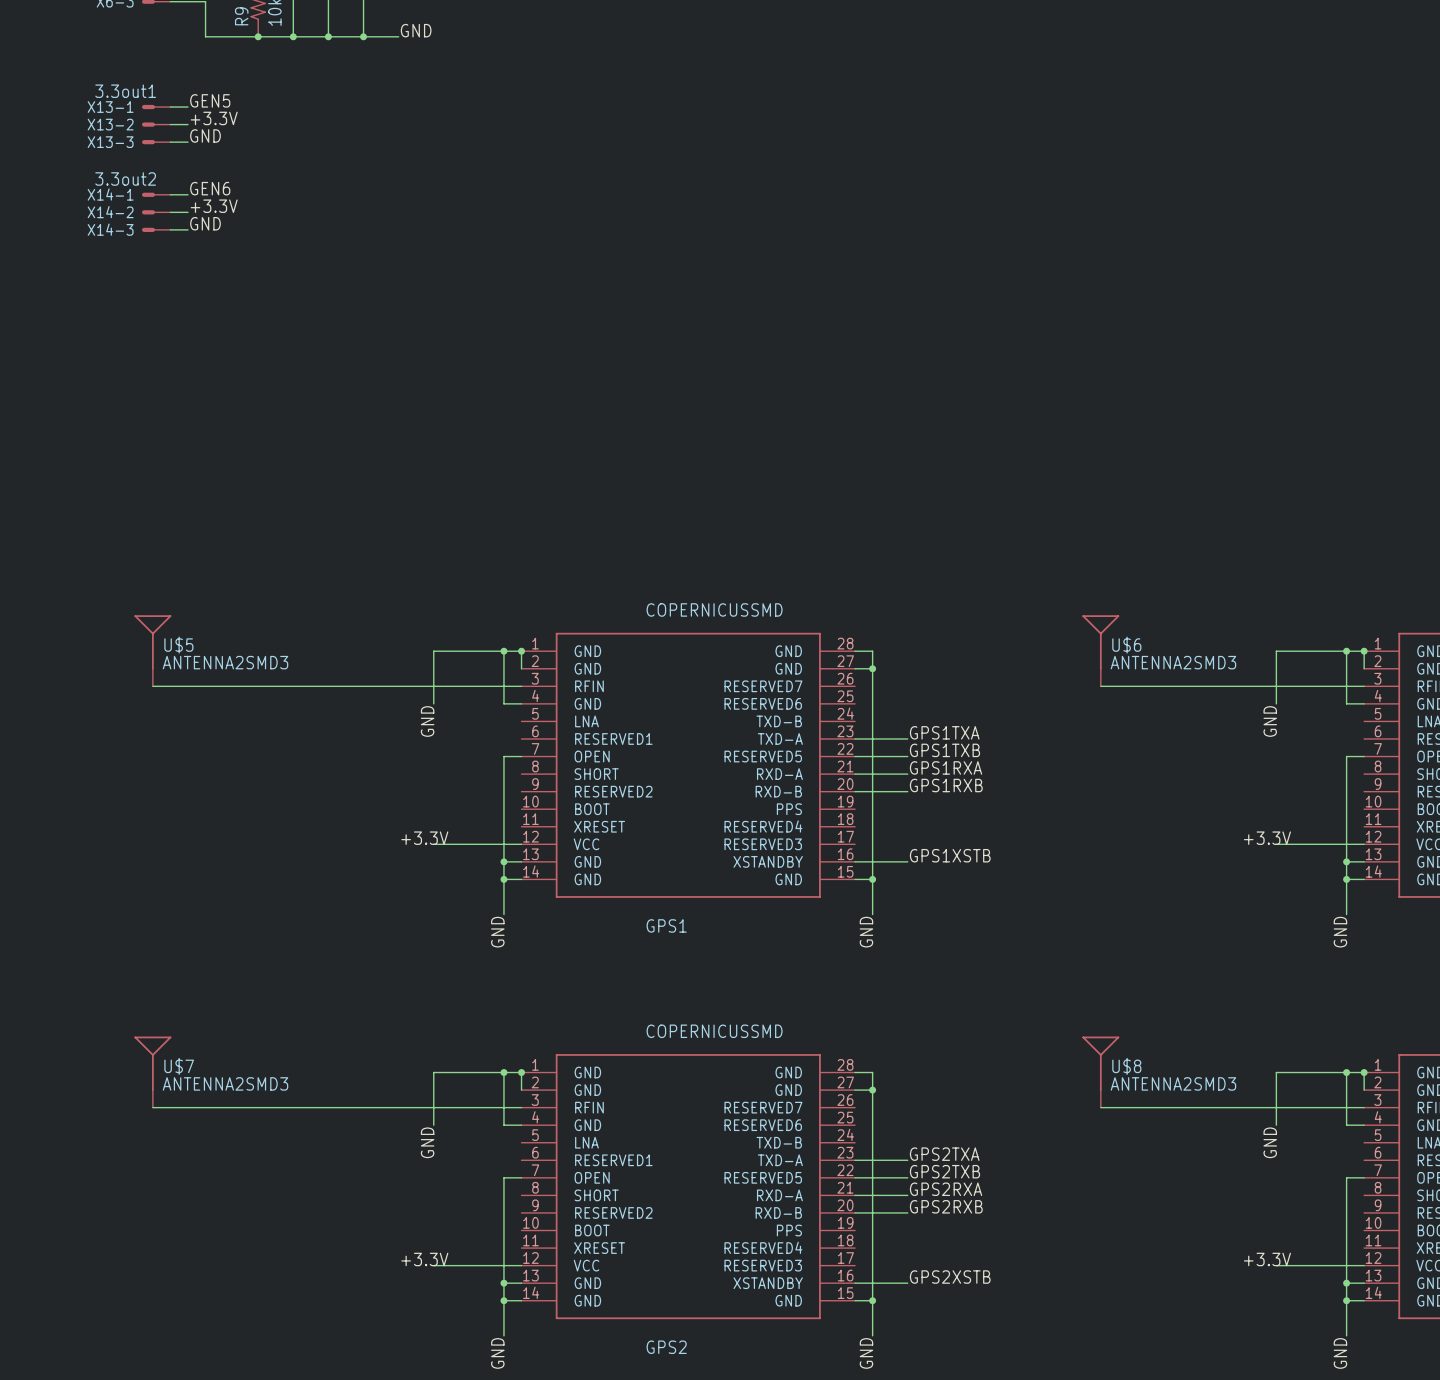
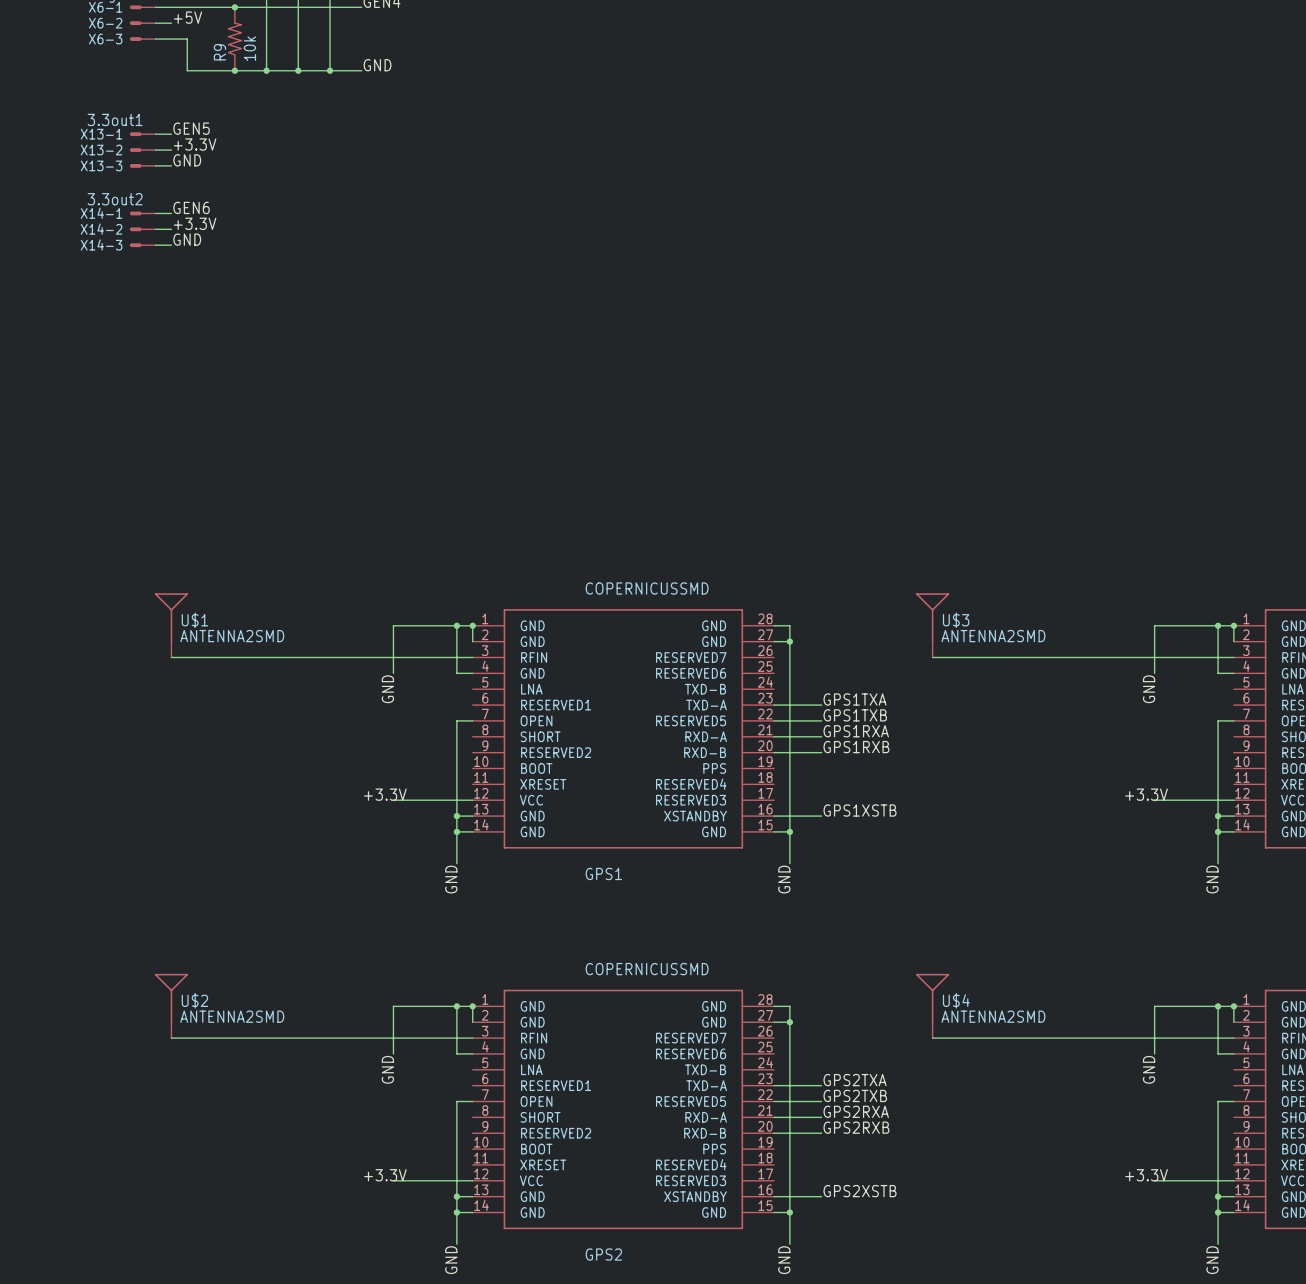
U$5: ANTENNA2SMD3 (152, 650) -> none
U$1: none -> ANTENNA2SMD (171, 625)
U$3: none -> ANTENNA2SMD (932, 625)
U$6: ANTENNA2SMD3 (1100, 650) -> none
wire: (152, 686) (187, 686) -> none
wire: none -> (932, 657) (996, 657)
U$7: ANTENNA2SMD3 (152, 1072) -> none
U$2: none -> ANTENNA2SMD (171, 1005)
U$4: none -> ANTENNA2SMD (932, 1005)
U$8: ANTENNA2SMD3 (1100, 1072) -> none
wire: (152, 1107) (187, 1107) -> none
wire: none -> (932, 1038) (996, 1038)

